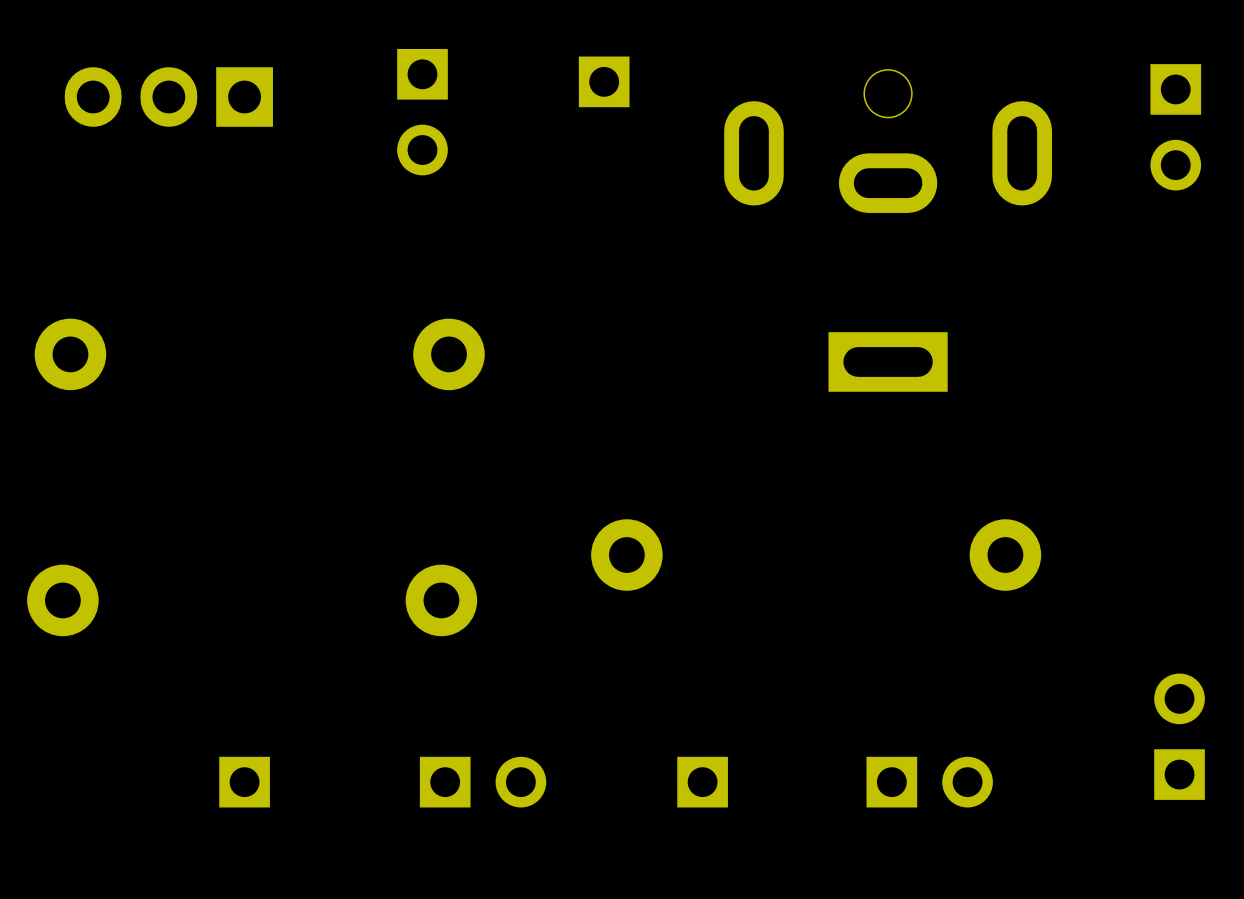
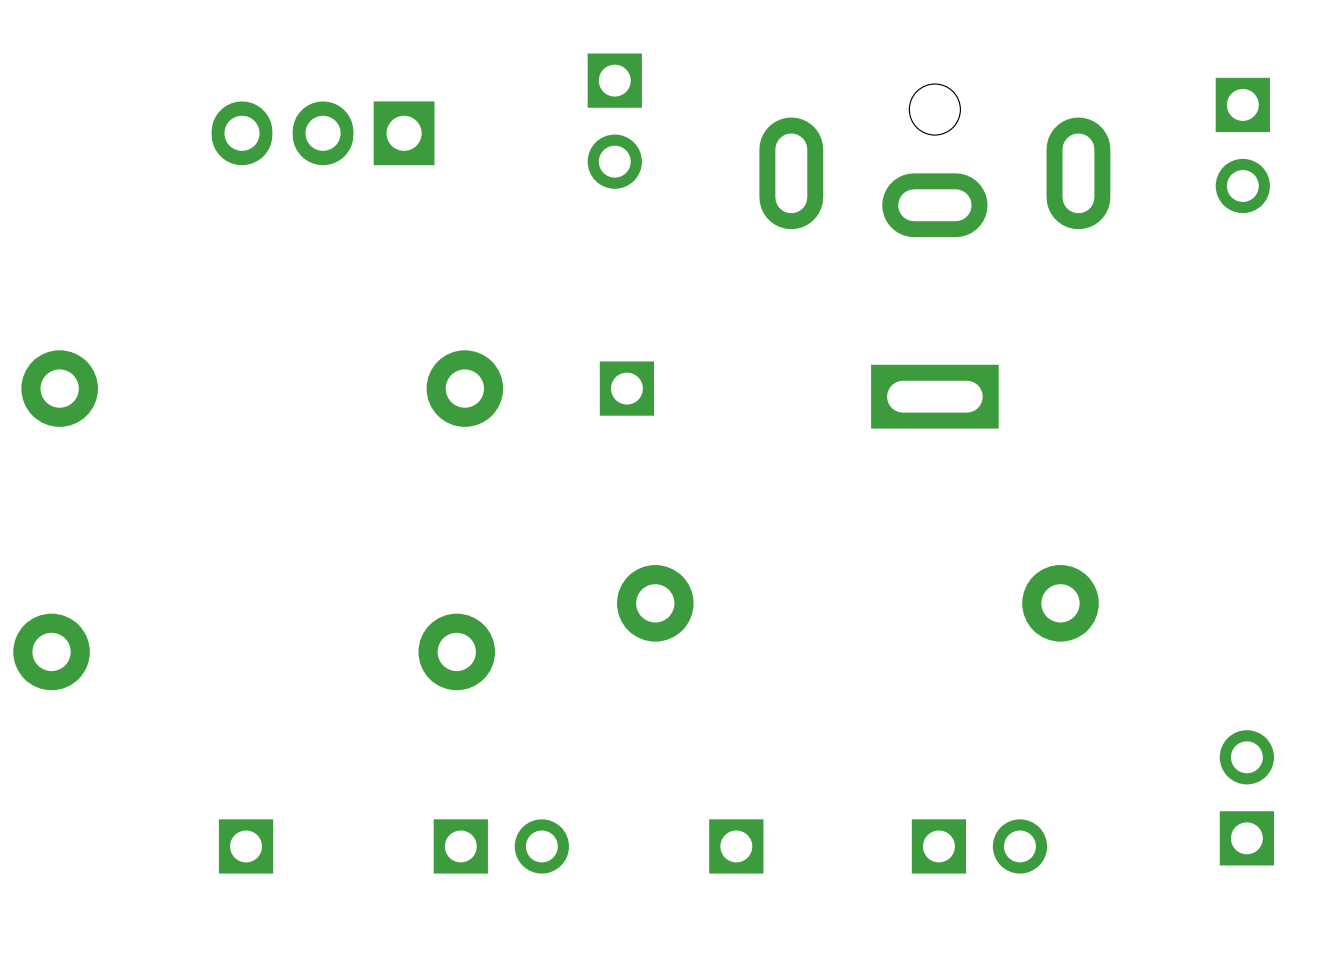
part footprint: [578, 56, 630, 108] -> [587, 53, 642, 189]
part position: (168, 97) -> (323, 133)
part: (422, 112) -> none
part: none -> (626, 388)

